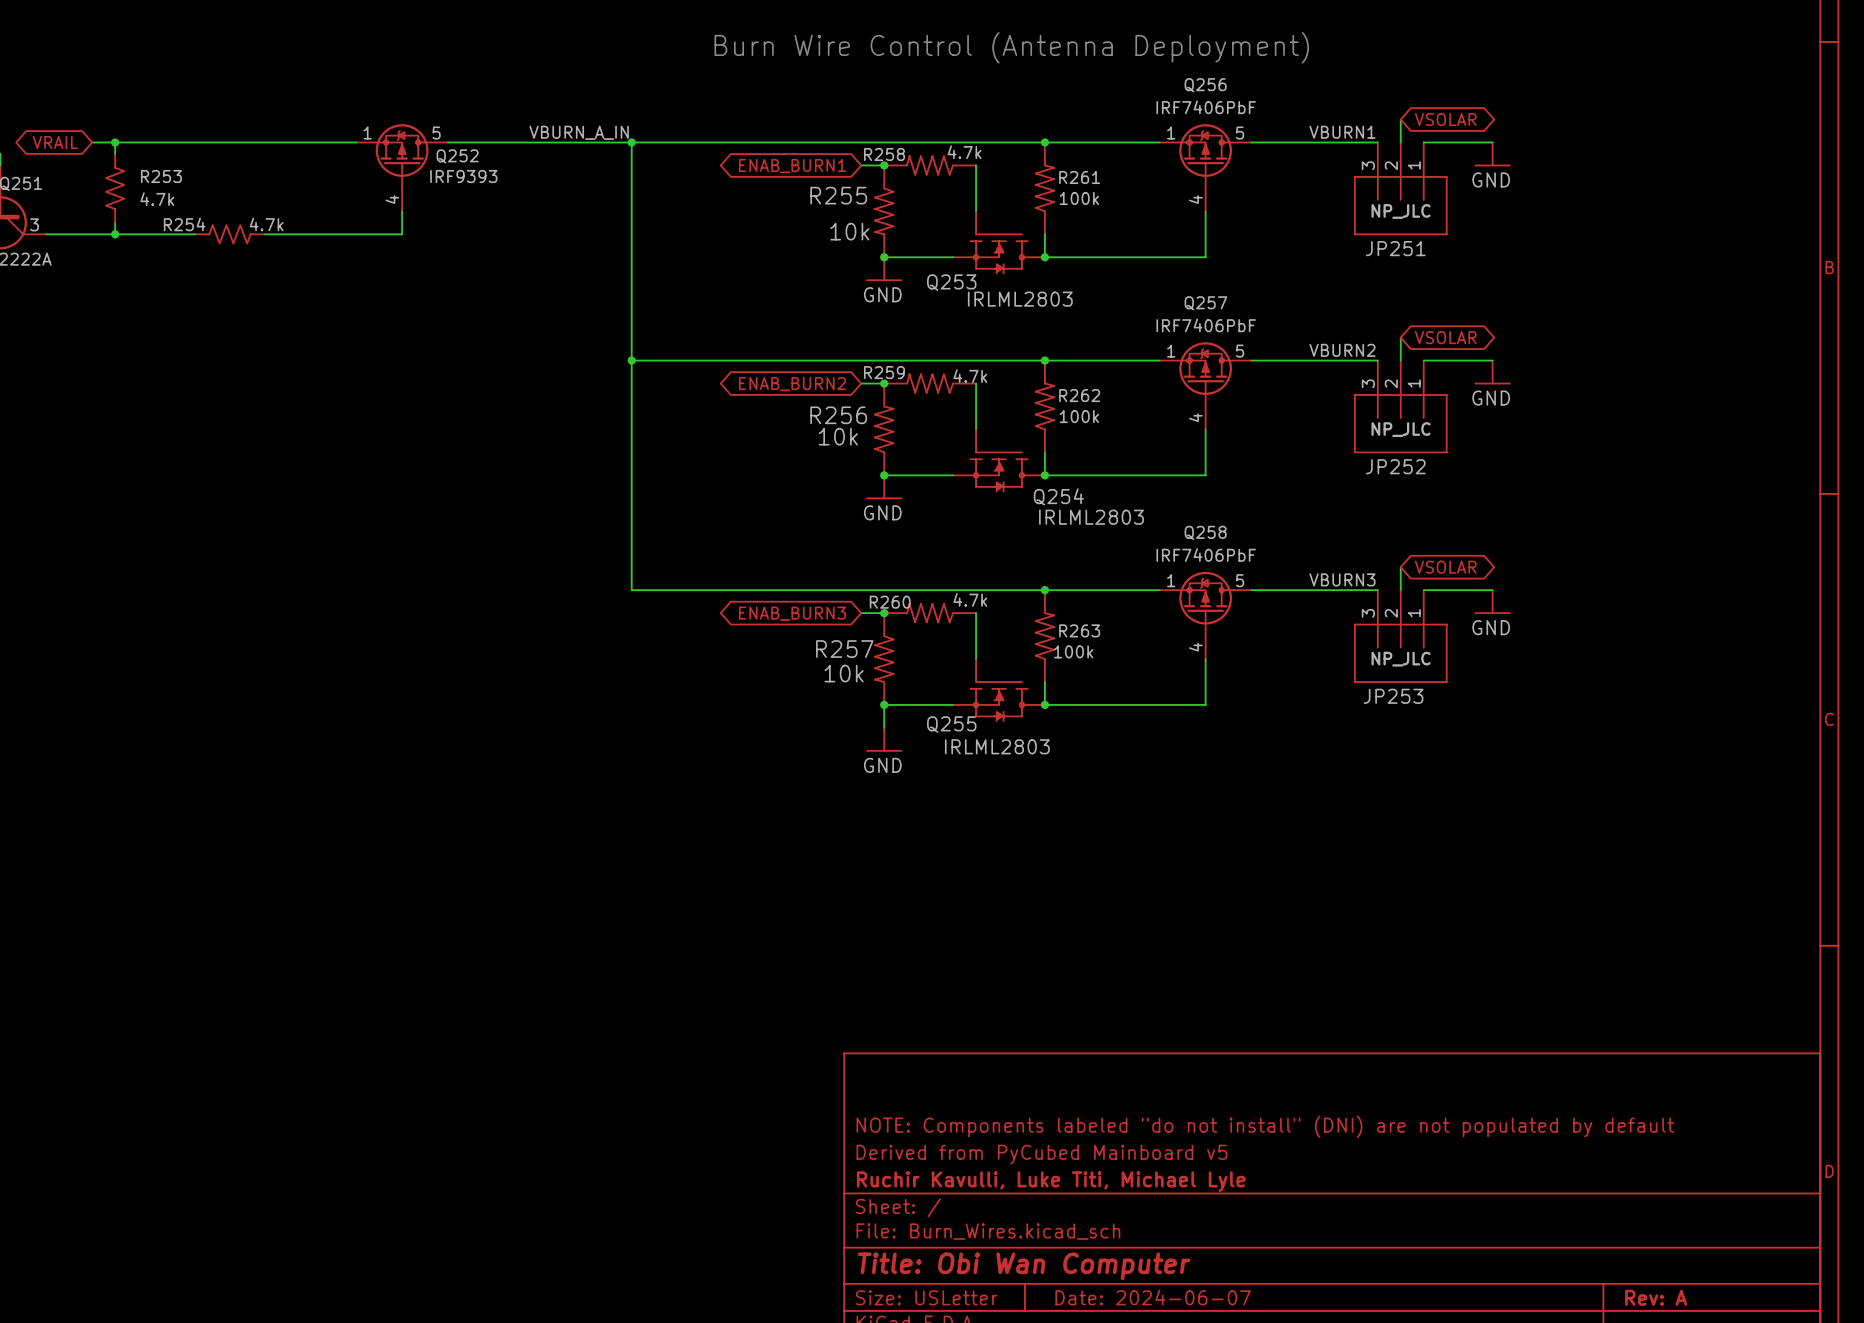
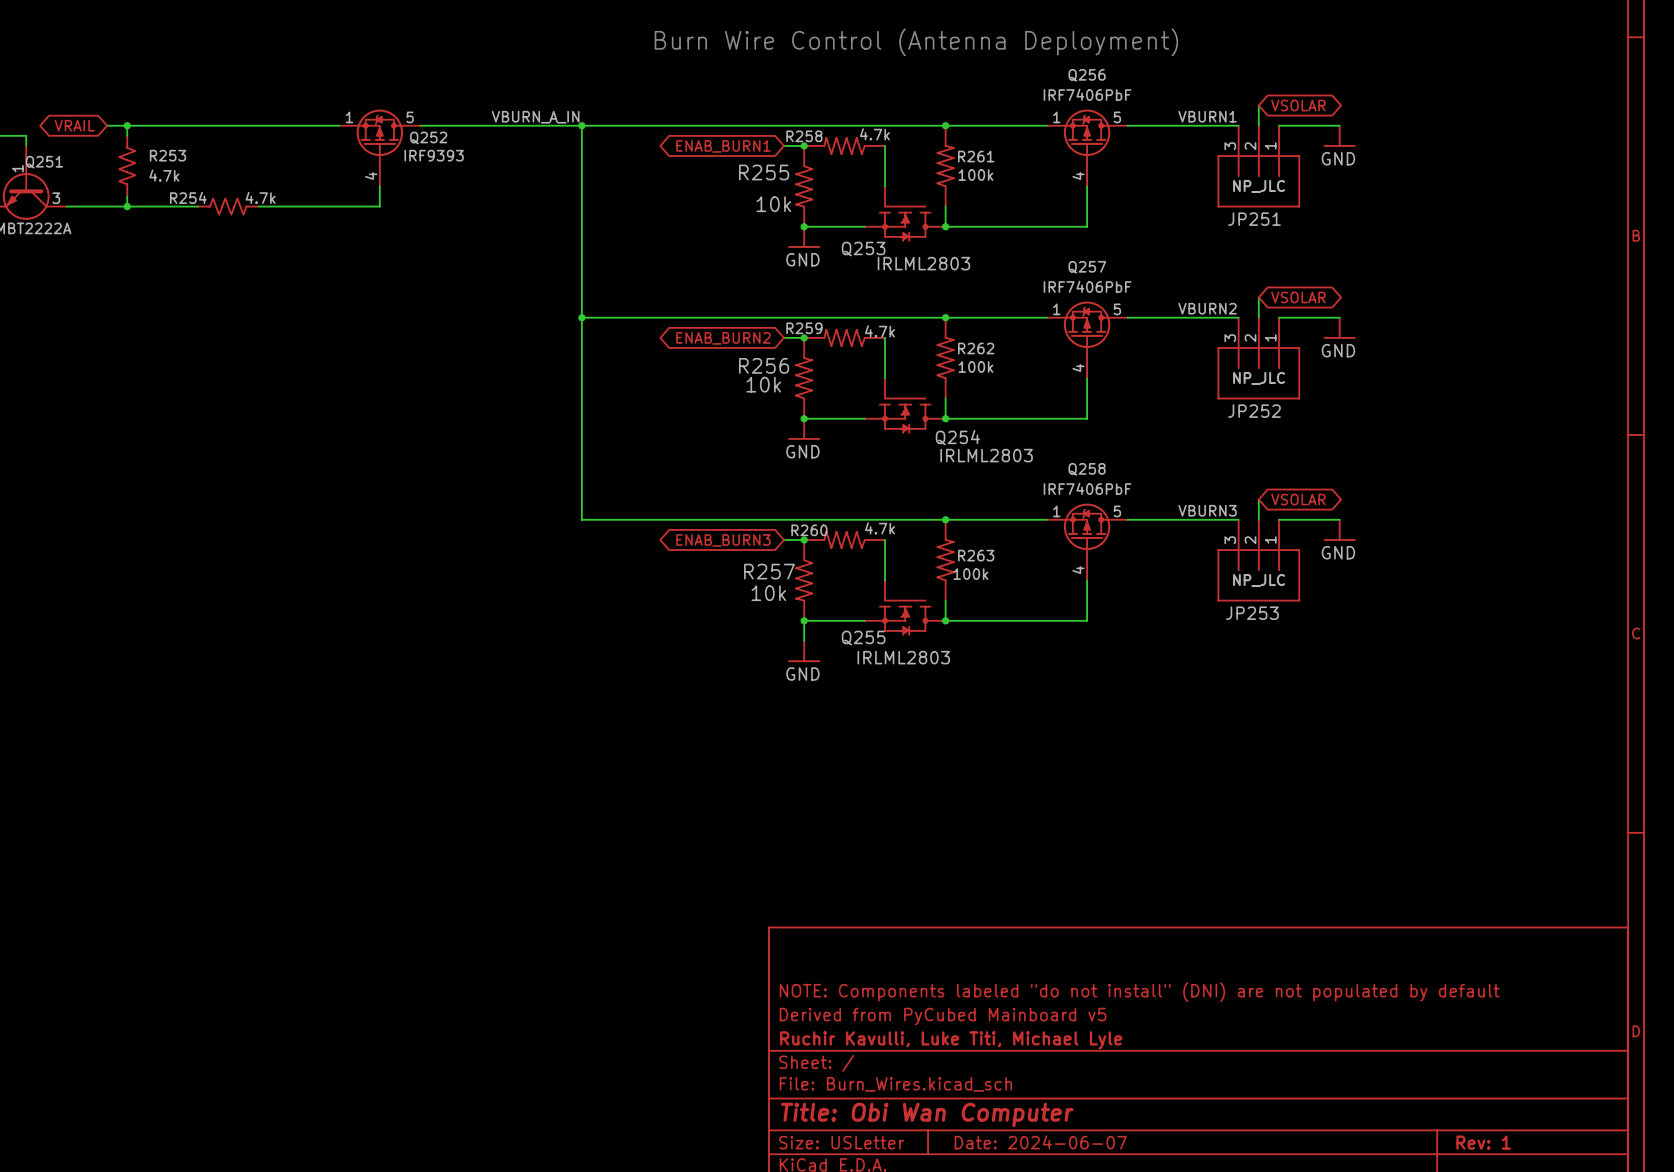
title block: Rev: A (1656, 1297) -> Rev: 1 (1483, 1142)

